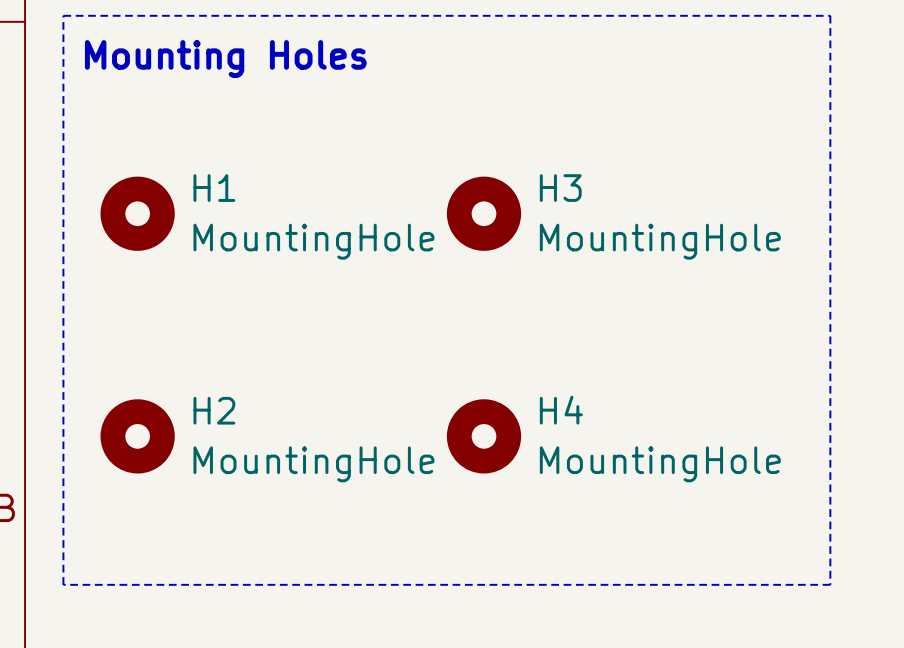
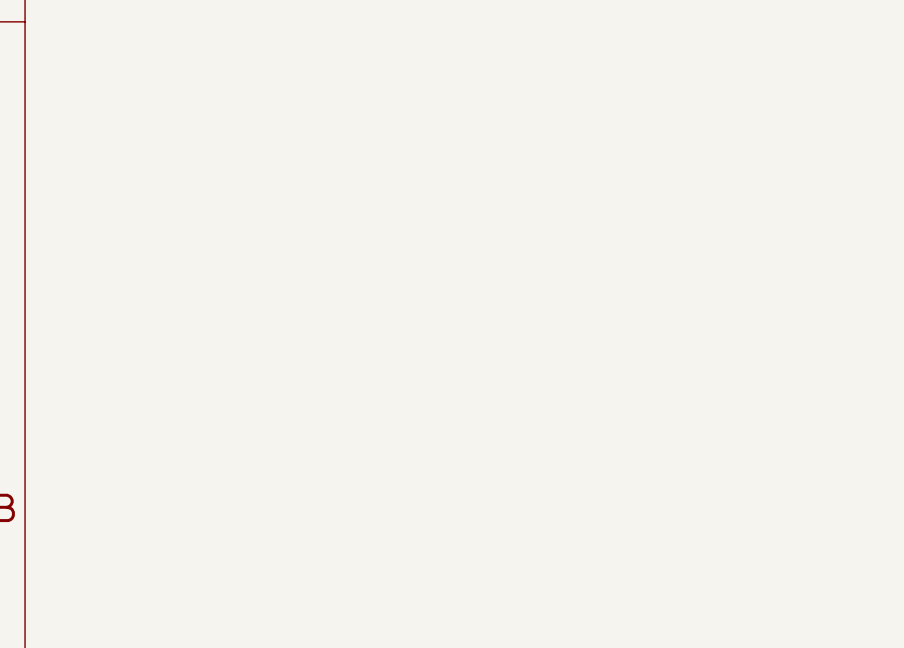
line: (63, 15) (830, 15) (830, 584) (63, 584) (63, 15) -> none
text: Mounting Holes (225, 59) -> none
H1: MountingHole (137, 213) -> none
H3: MountingHole (484, 213) -> none
H2: MountingHole (137, 436) -> none
H4: MountingHole (484, 436) -> none

